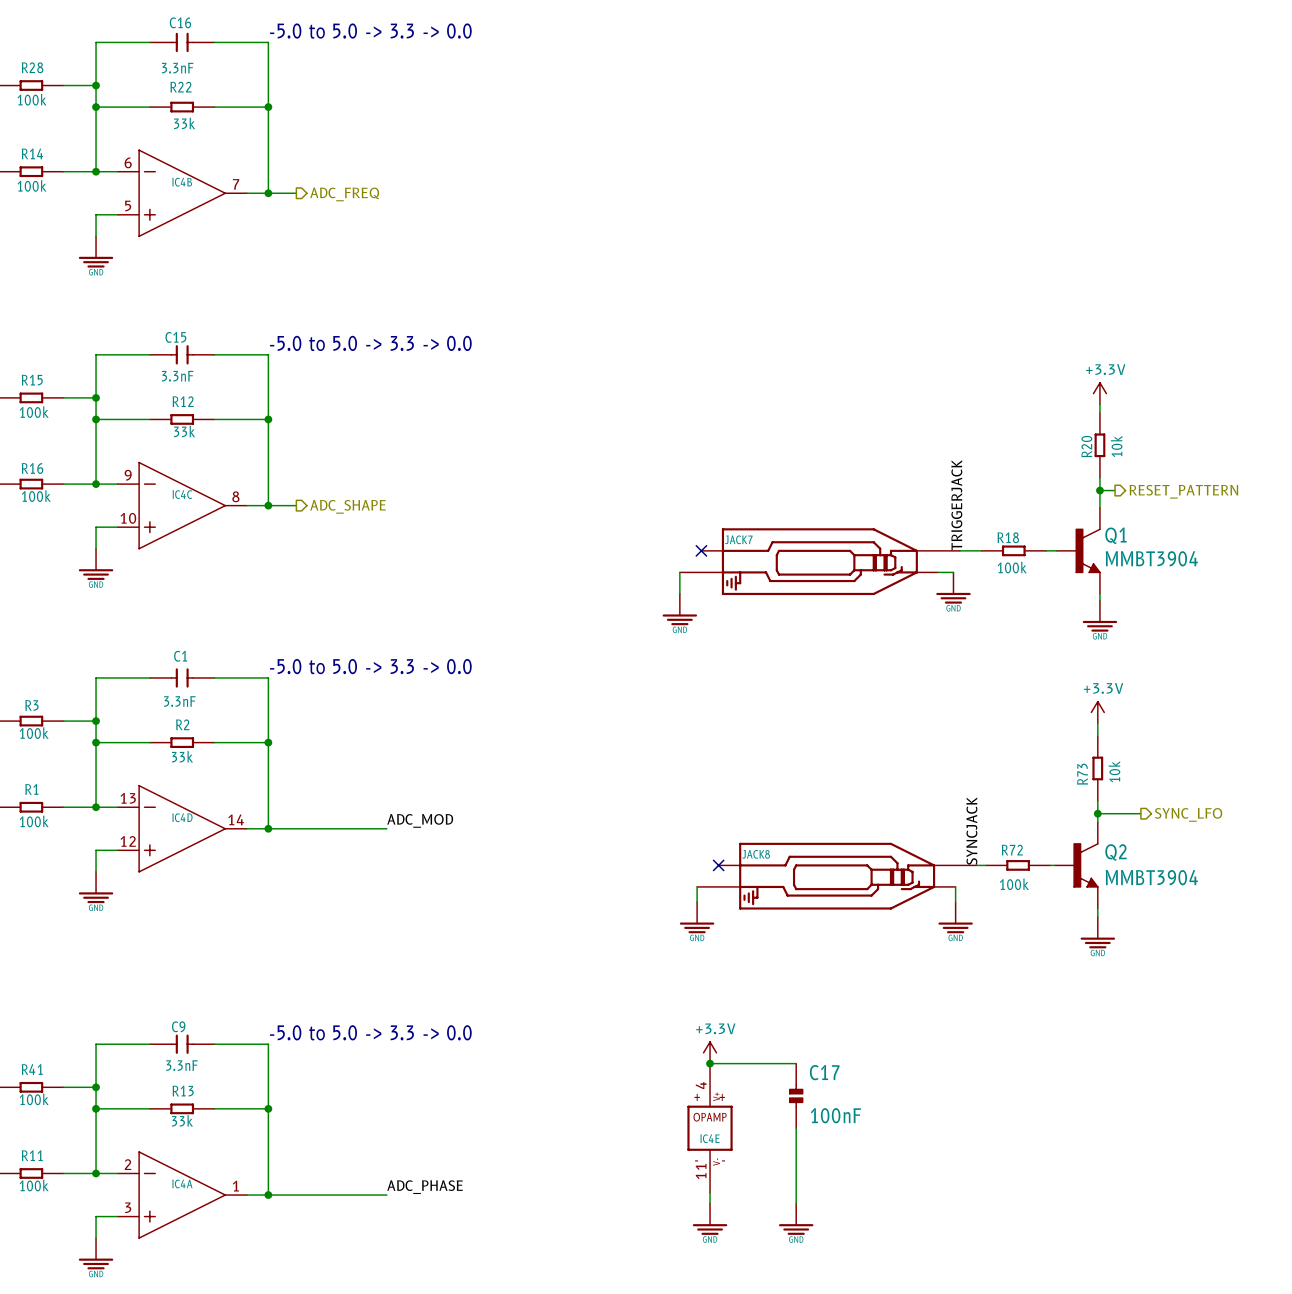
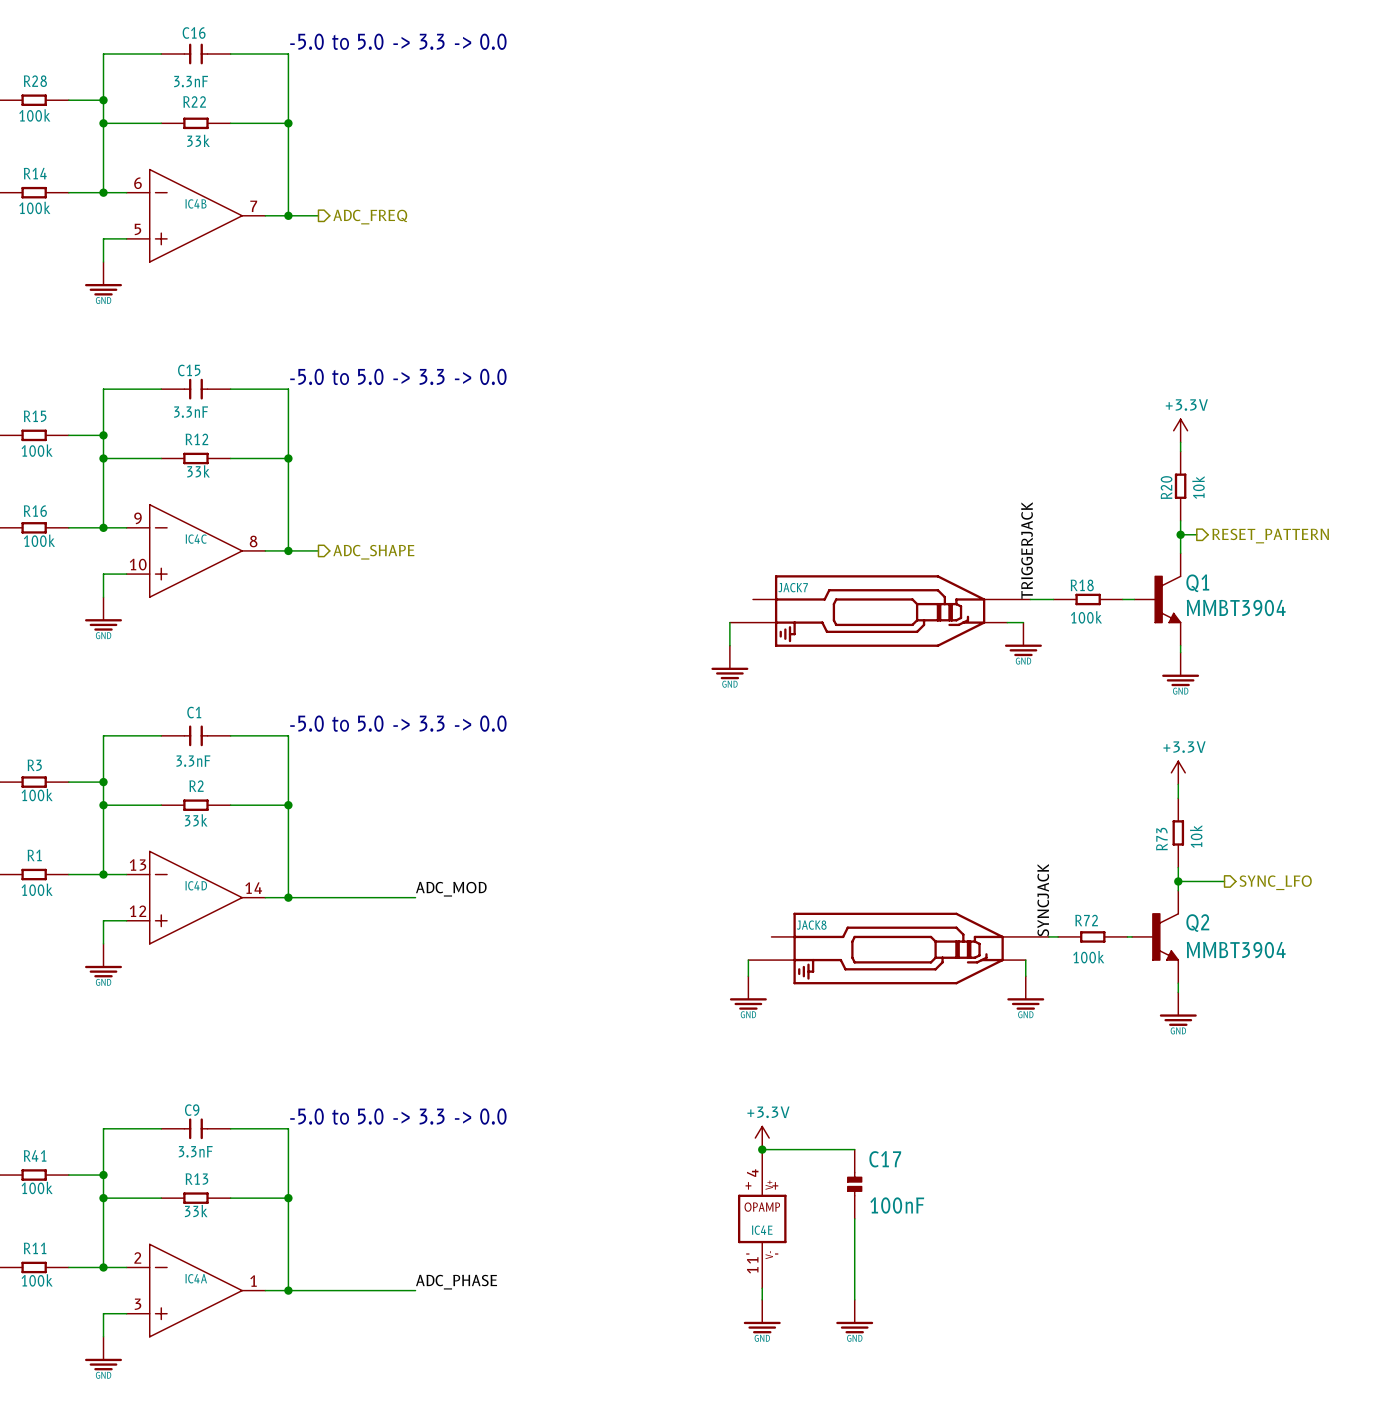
no-connect mark: (701, 550) -> none
no-connect mark: (718, 865) -> none

